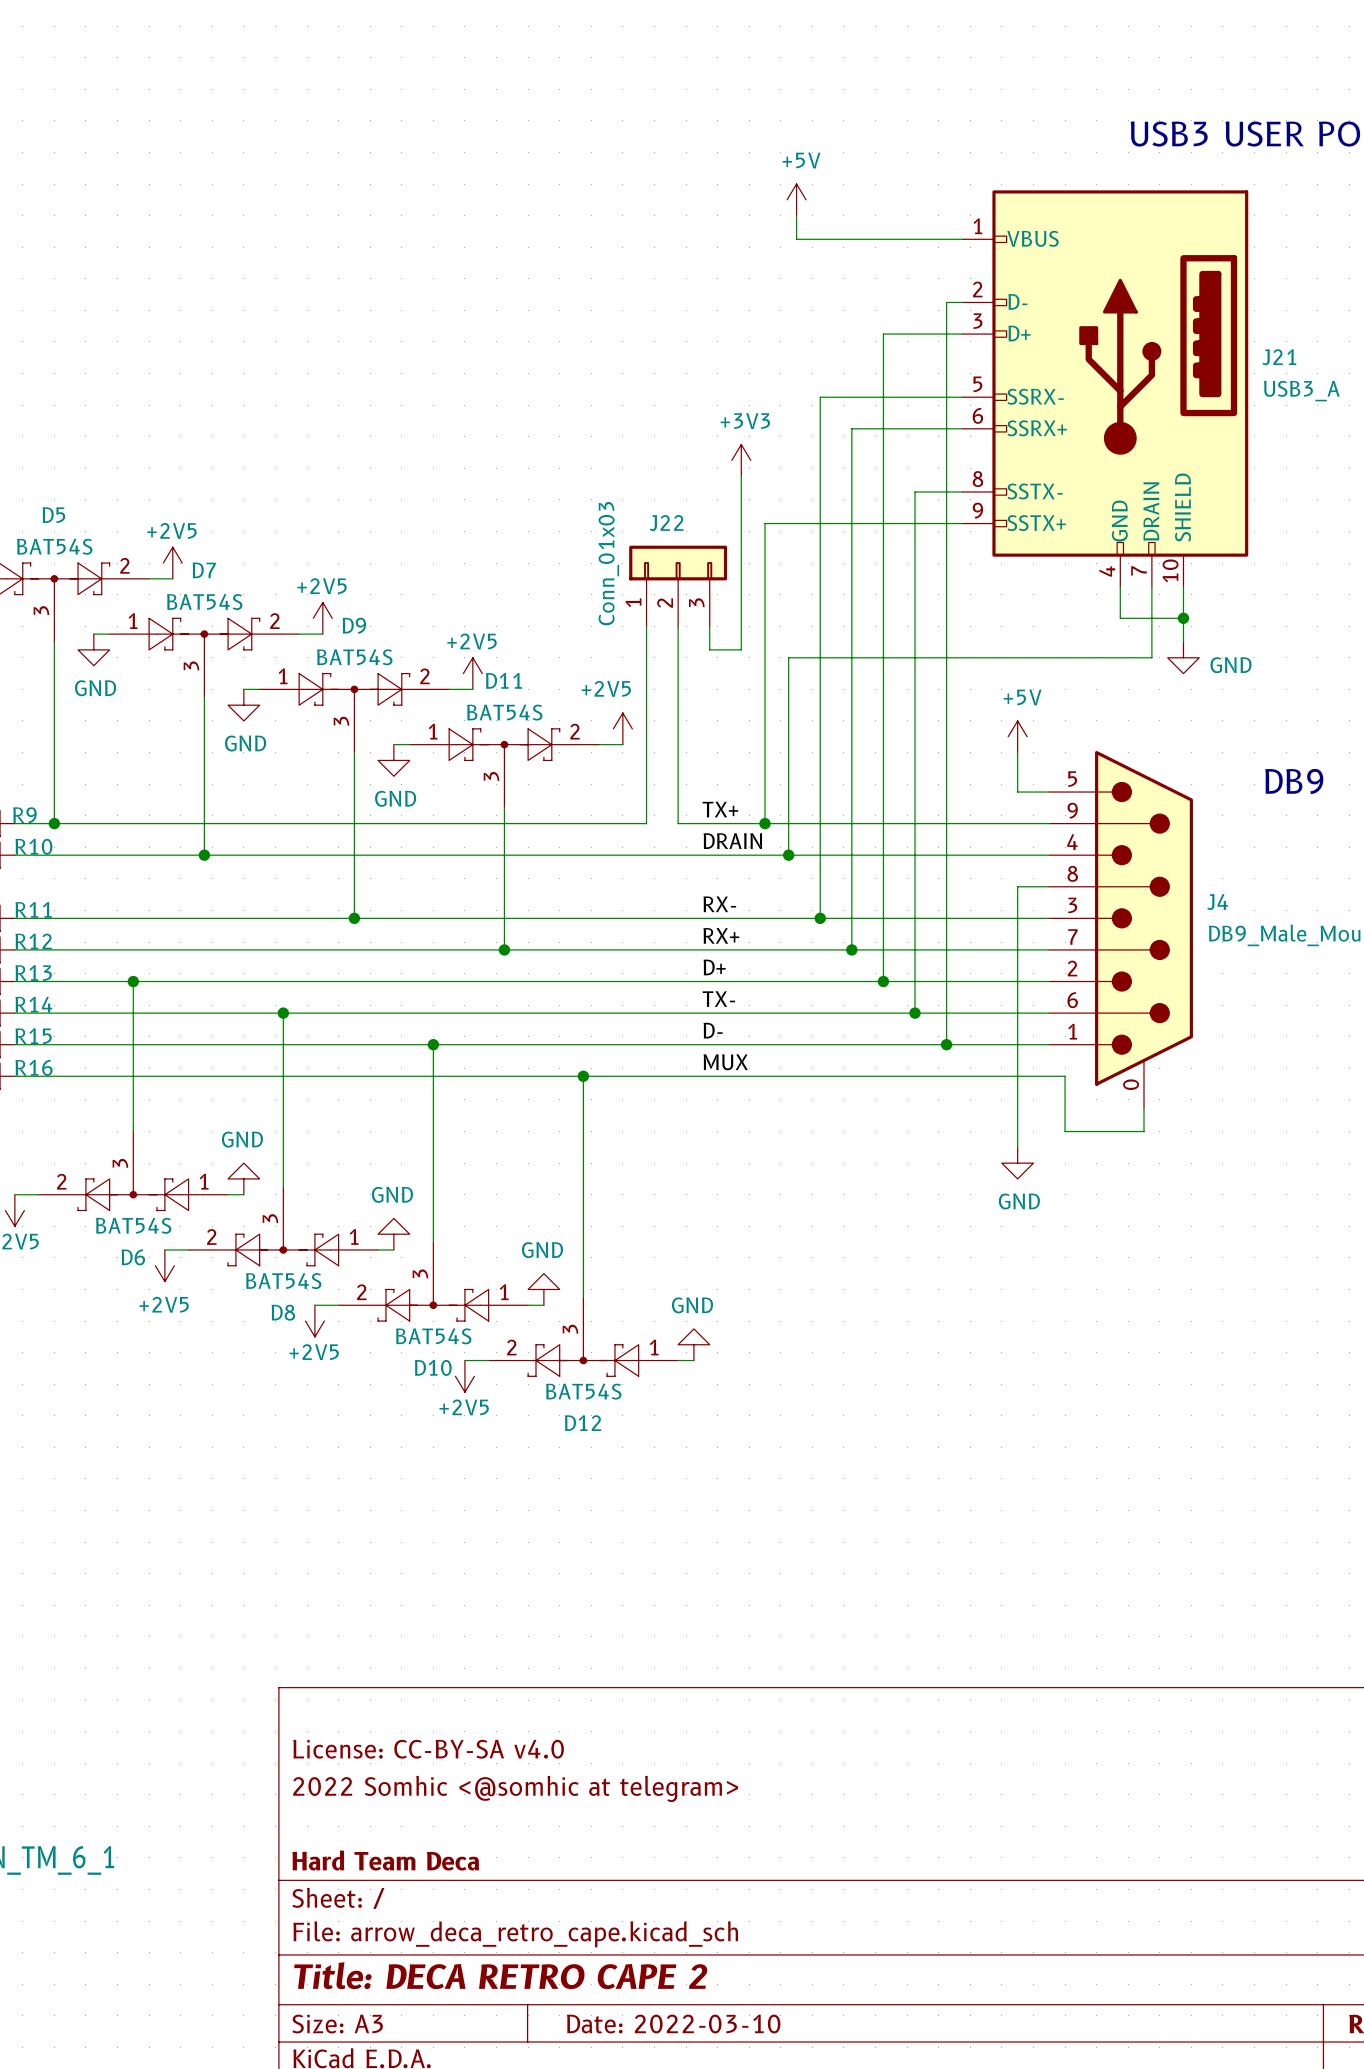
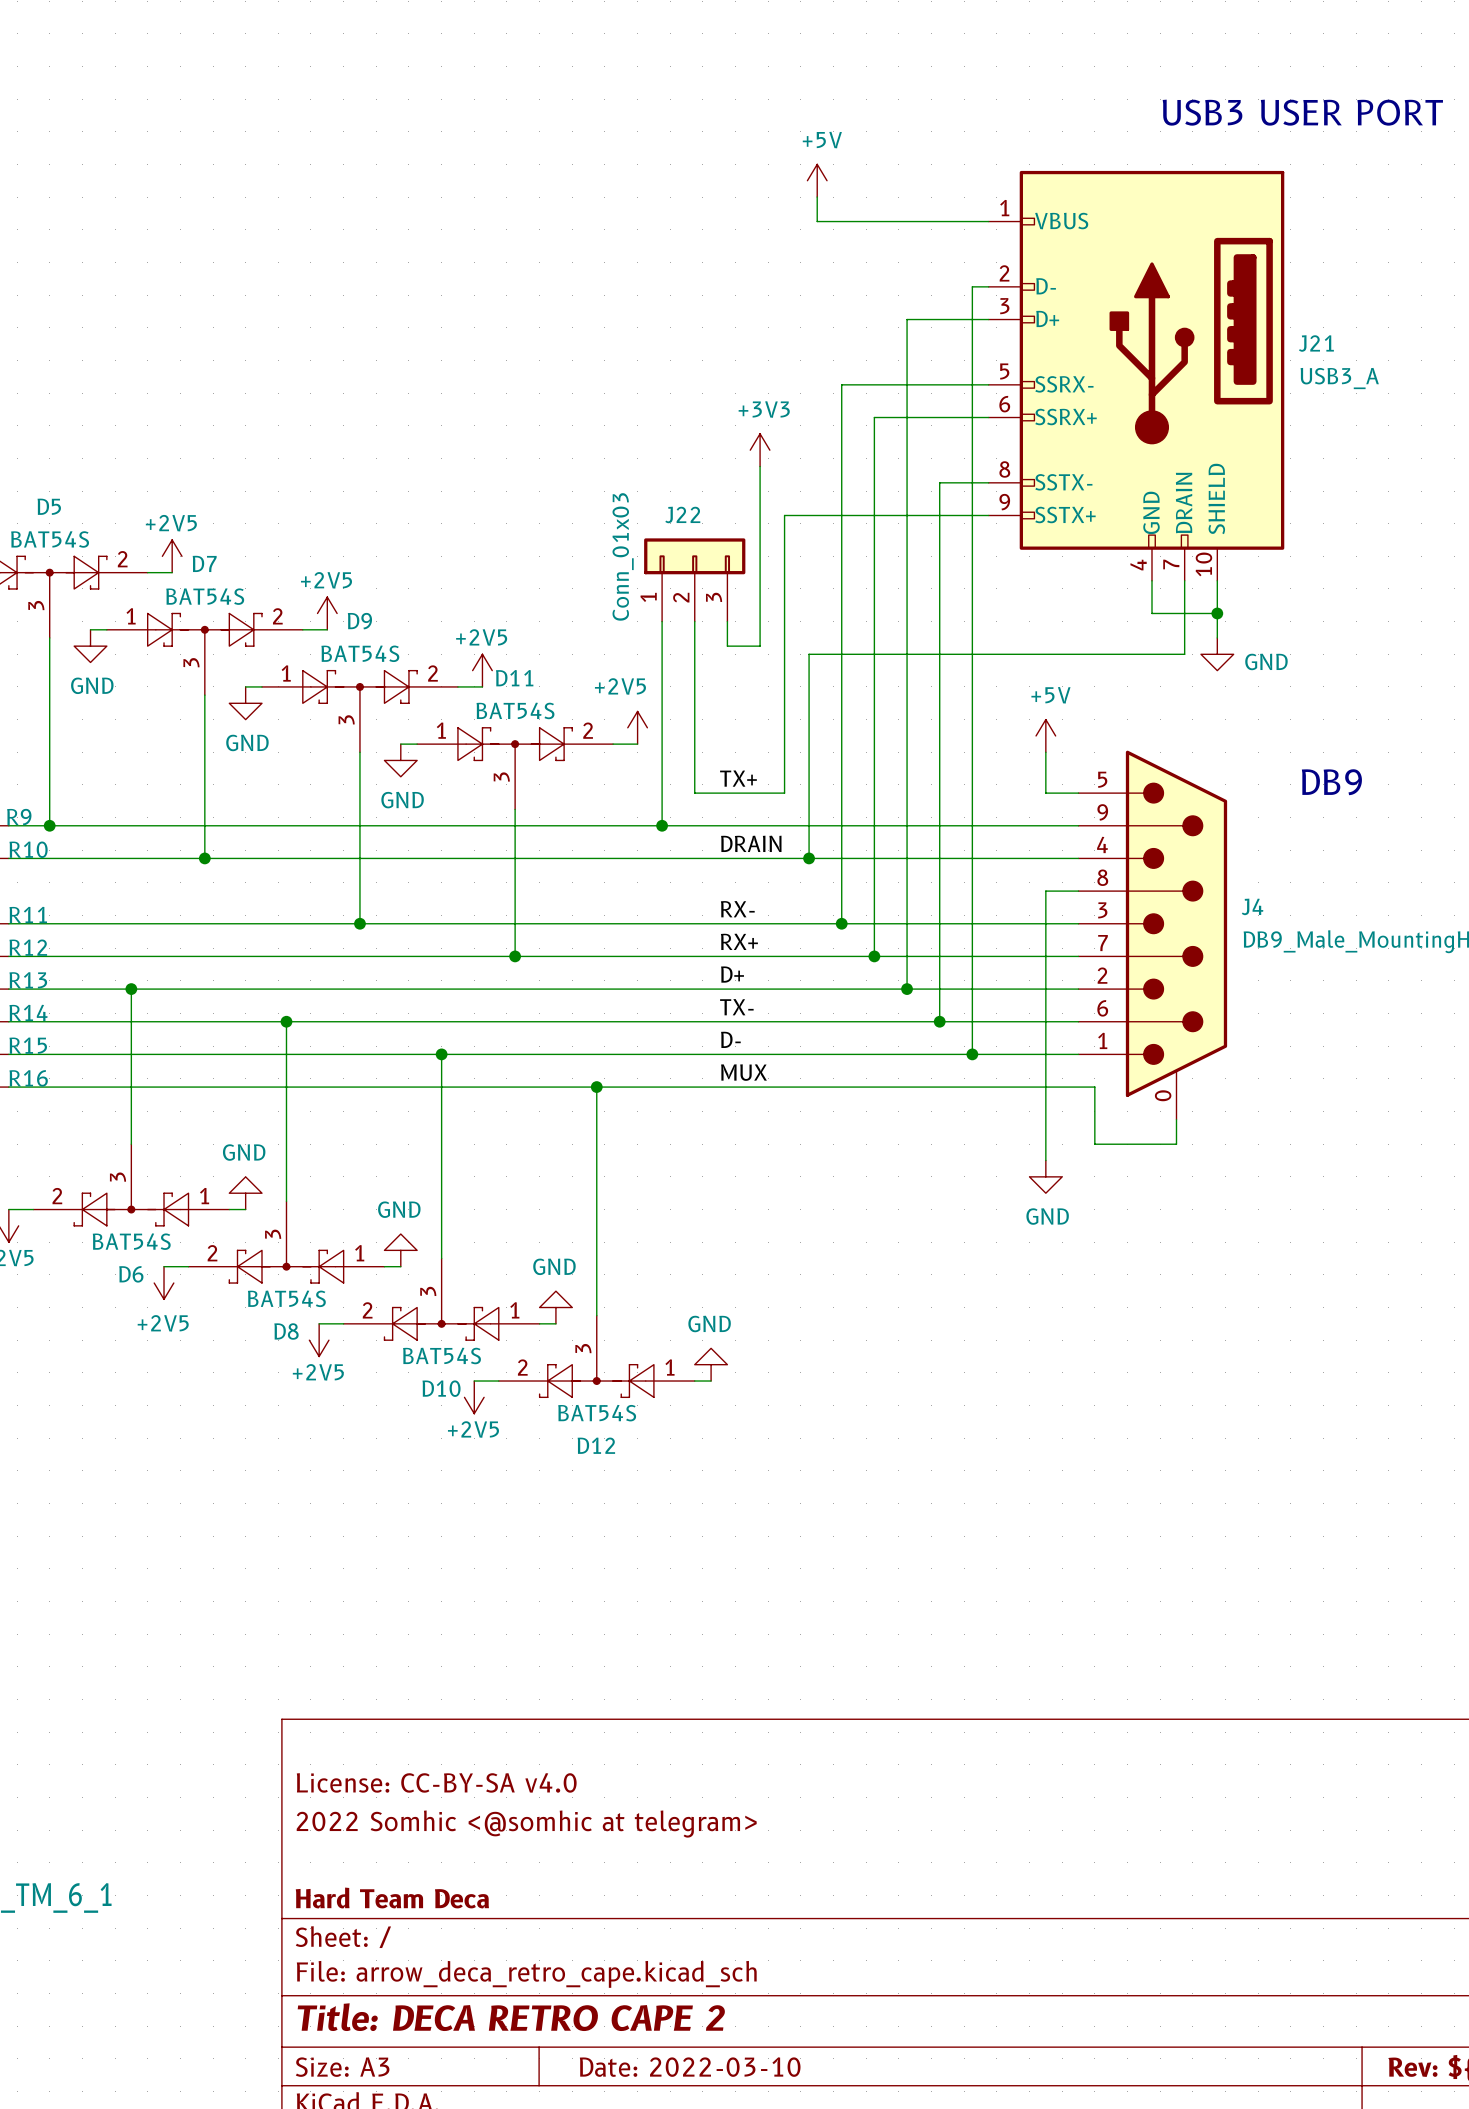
wire: (678, 792) (678, 823) -> (662, 825) (694, 825)
wire: (764, 792) (764, 823) -> (784, 793) (694, 793)
label position: TX+ (720, 809) -> TX+ (738, 778)
junction: none -> (662, 825)
junction: (764, 823) -> none

